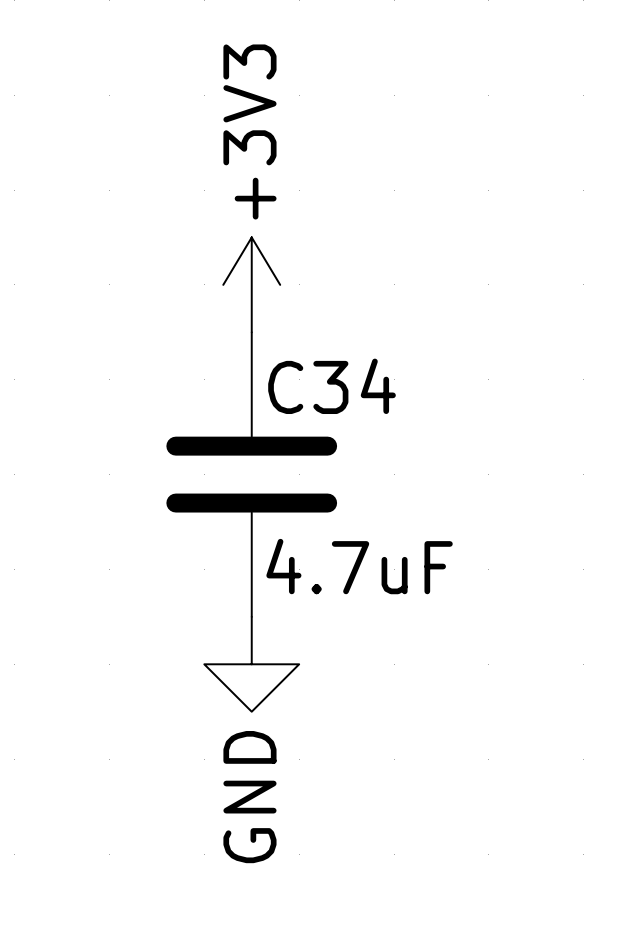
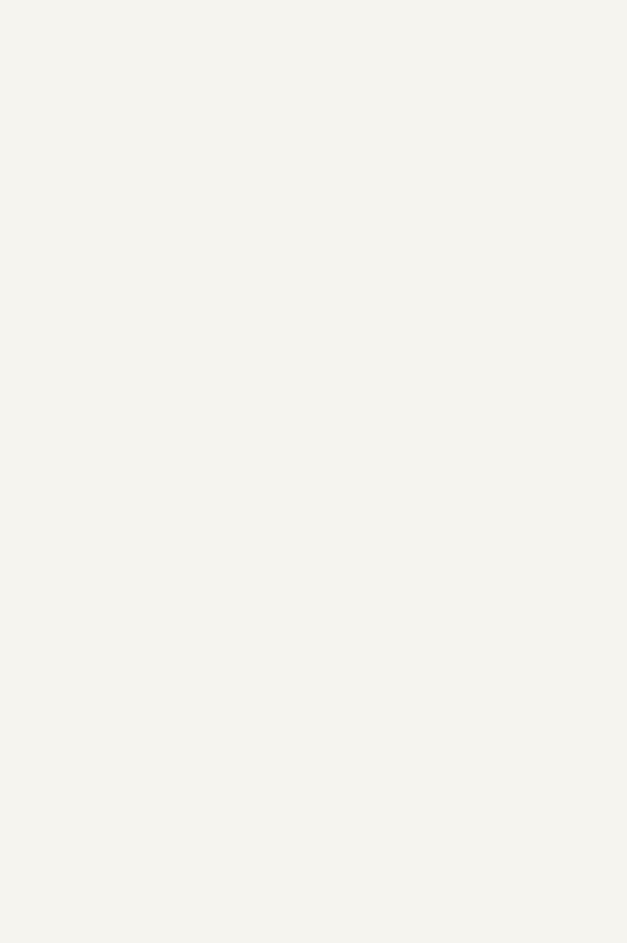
power symbol: +3V3 (251, 284) -> none
C34: 4.7uF (251, 474) -> none
power symbol: GND (251, 664) -> none

